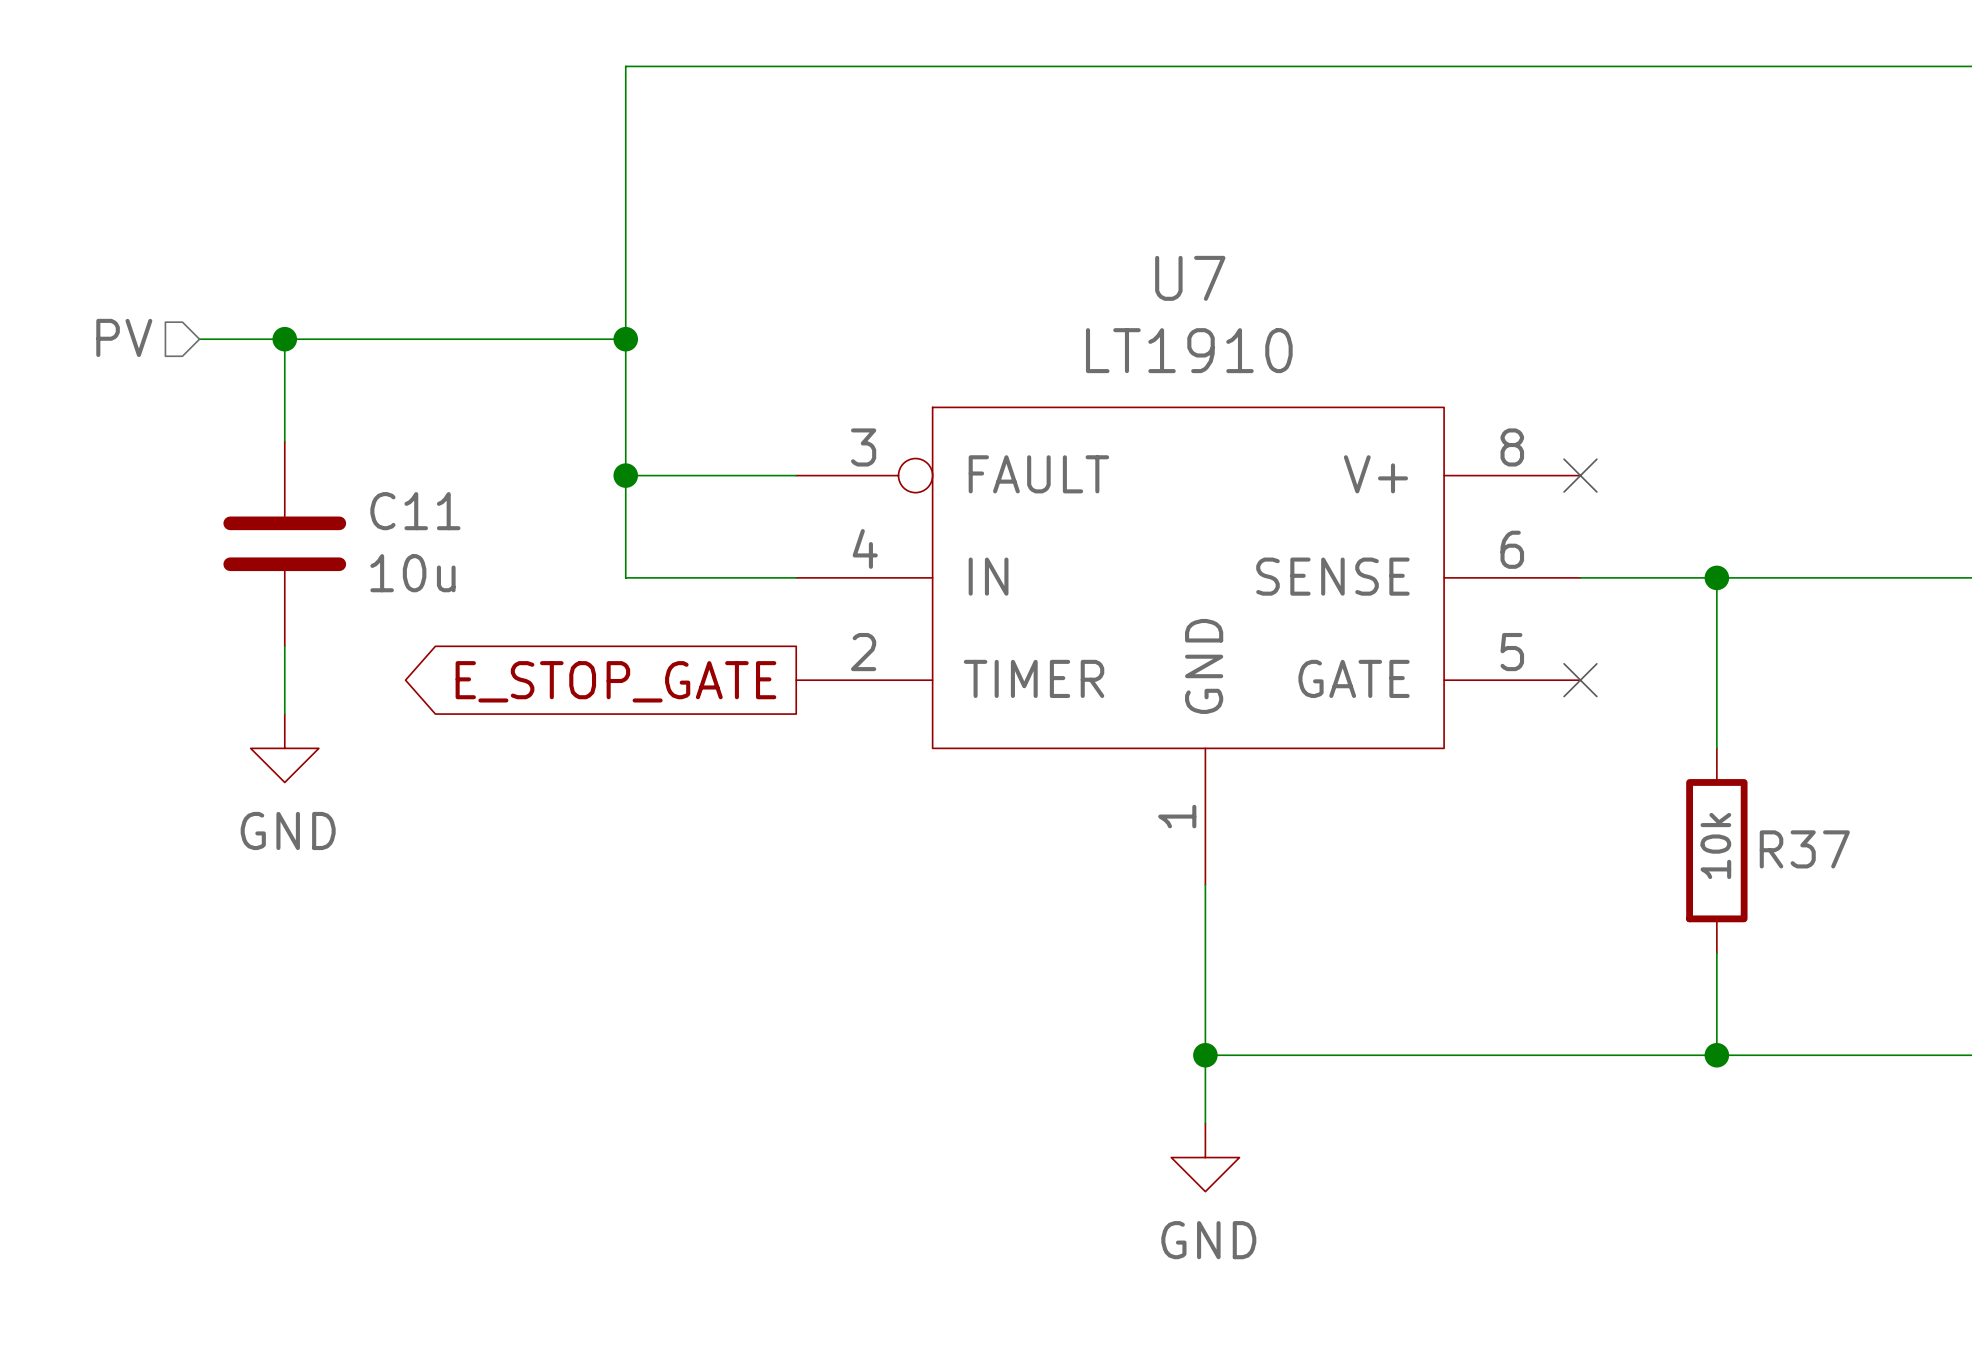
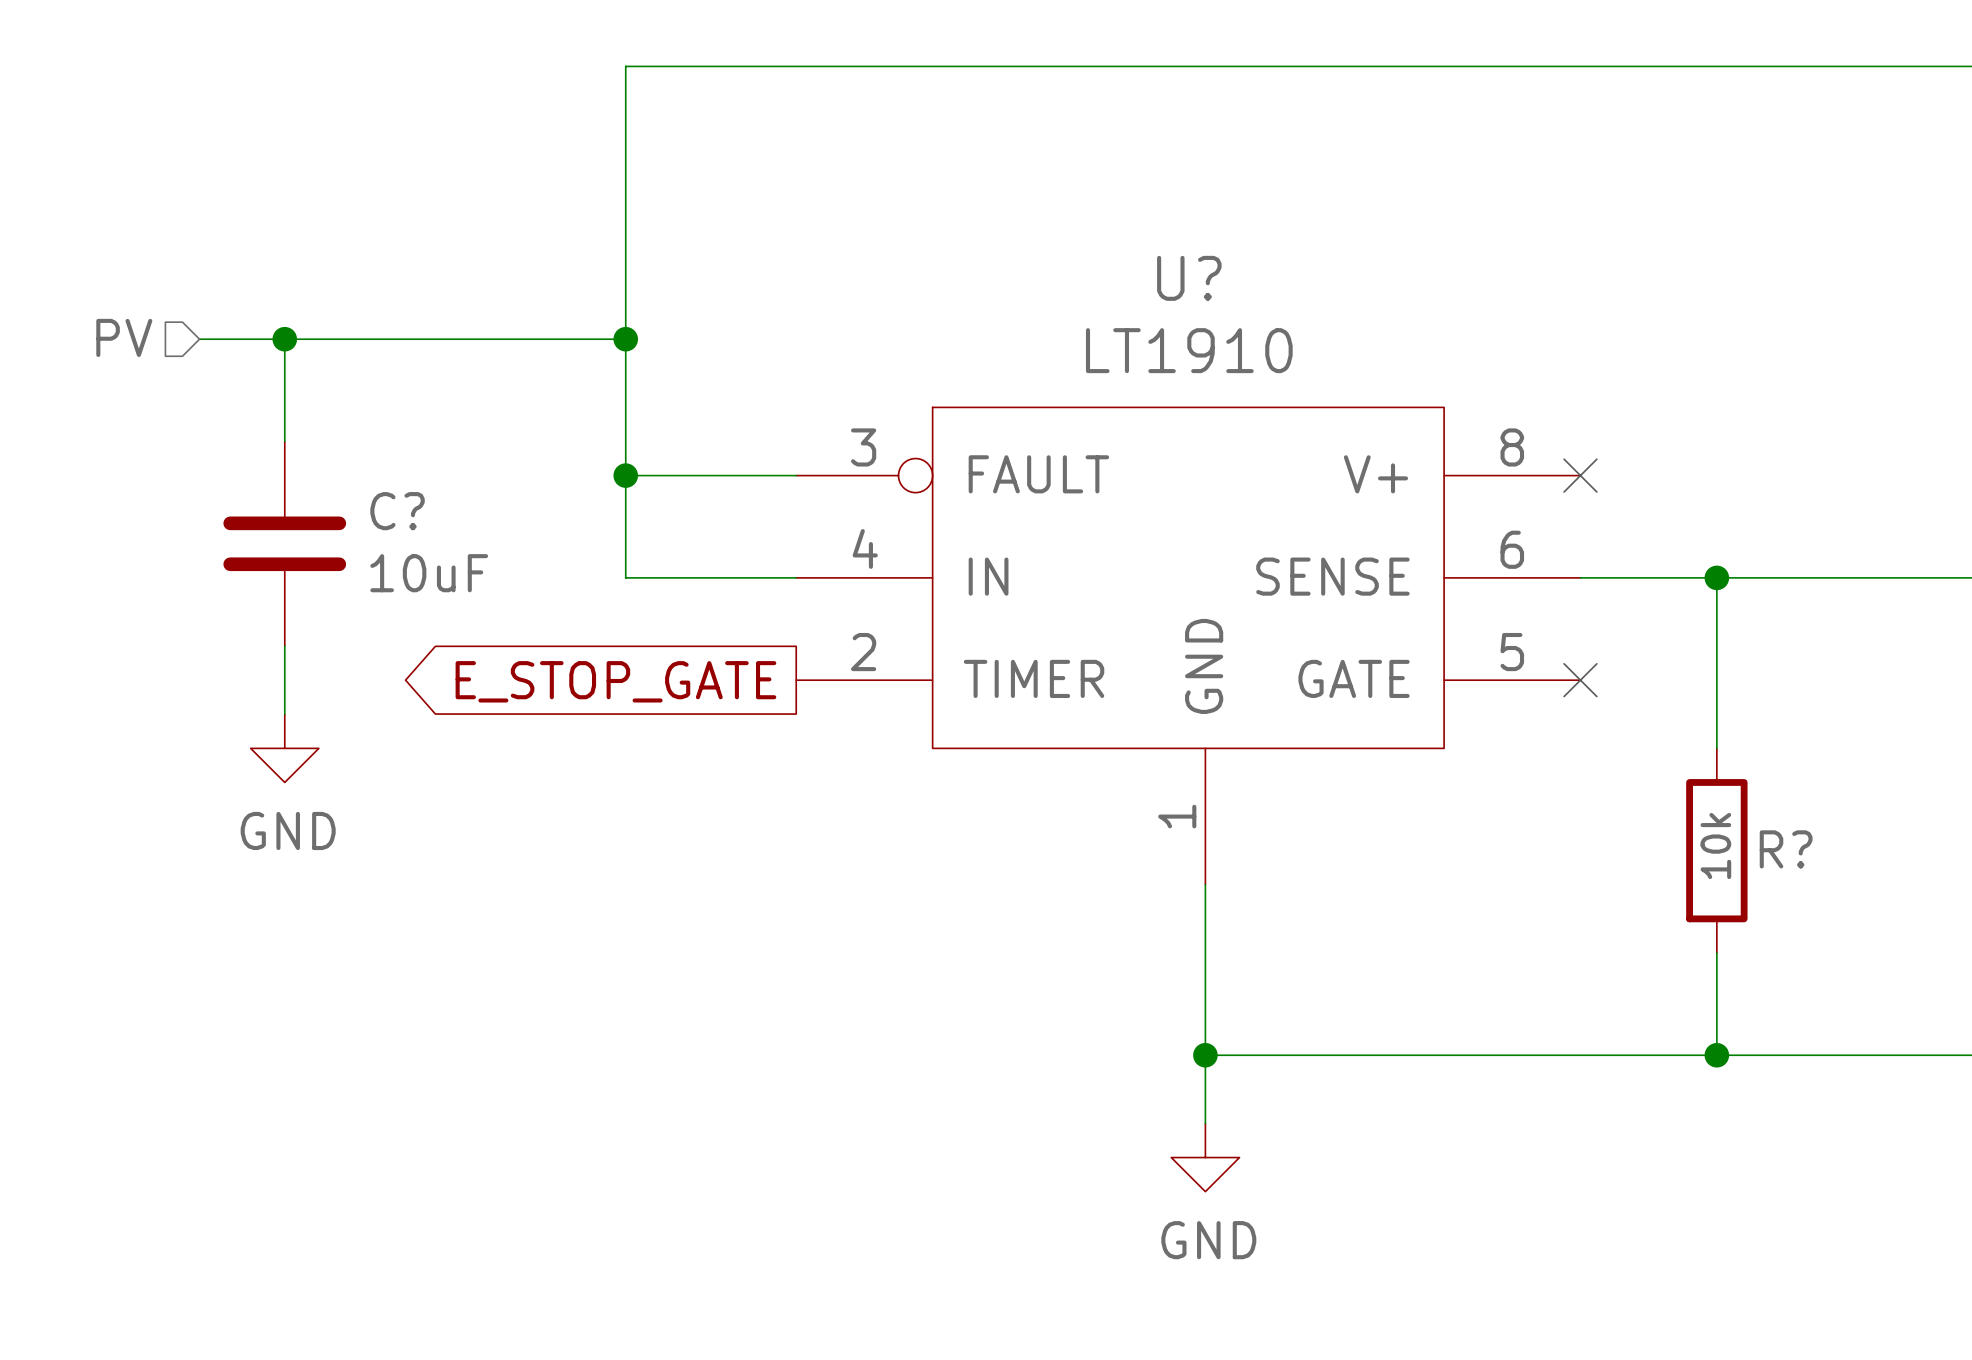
U7 name: U7 (1190, 278) -> U? (1189, 278)
C11 name: C11 (415, 511) -> C? (397, 511)
C11 value: 10u (412, 573) -> 10uF (429, 573)
R37 name: R37 (1804, 849) -> R? (1786, 849)

